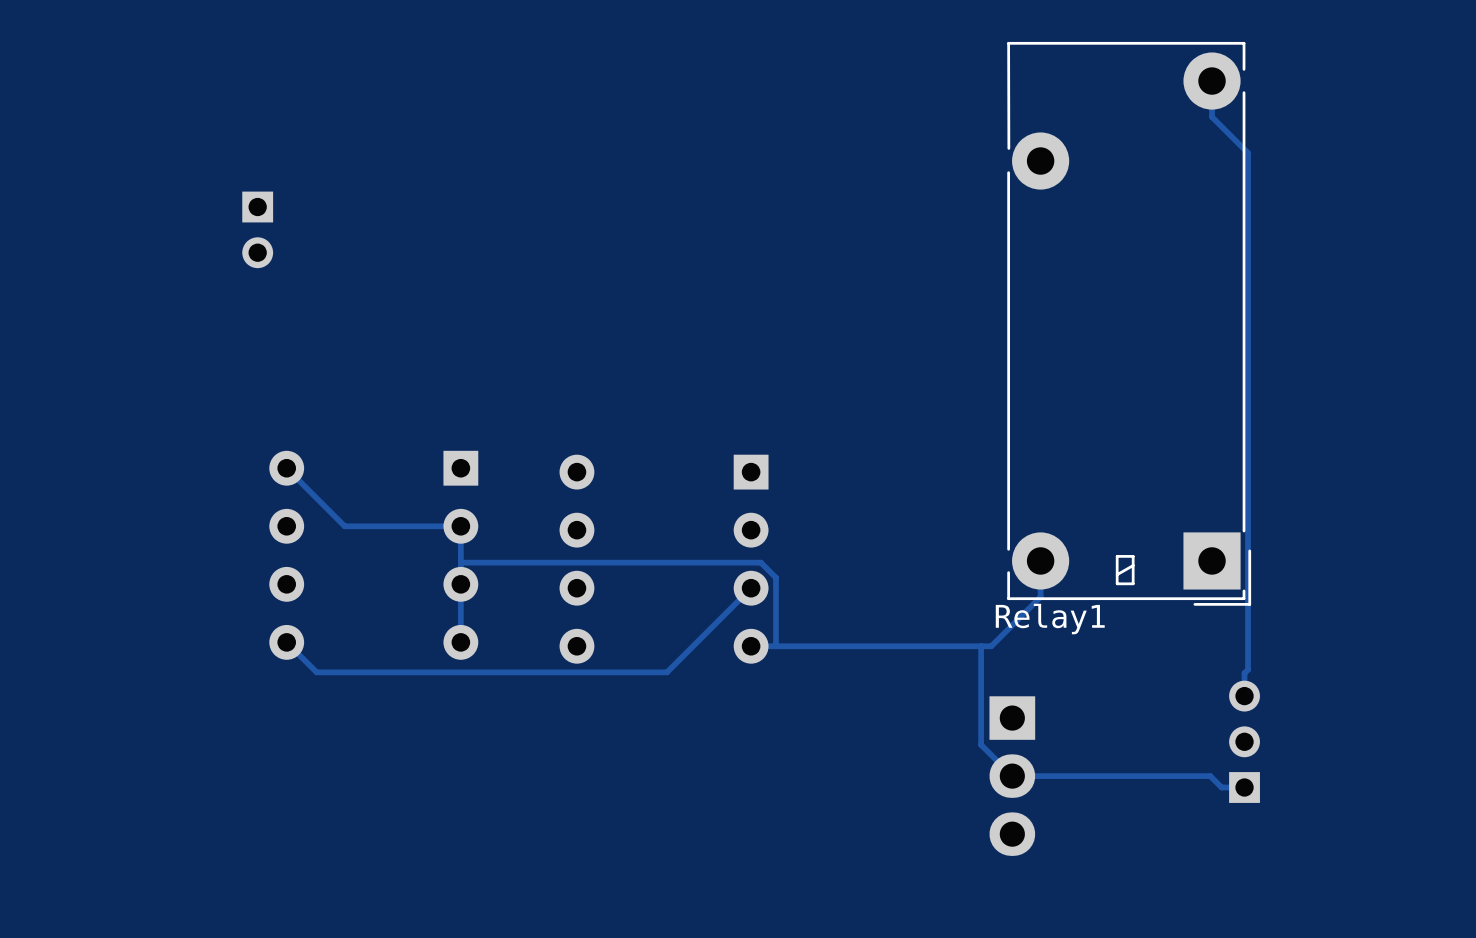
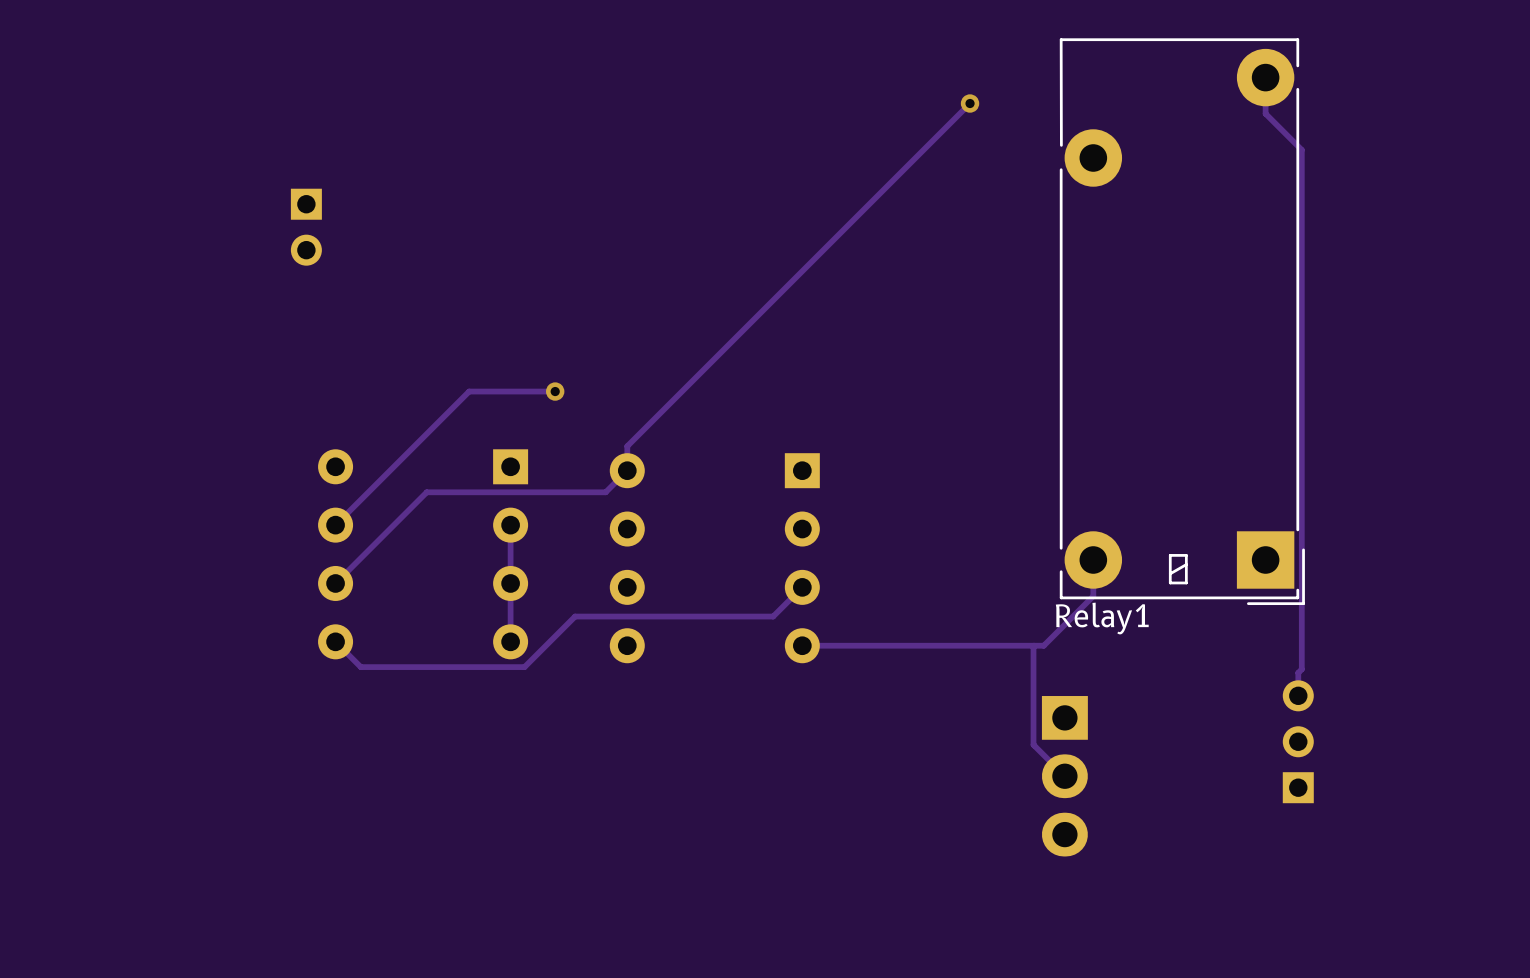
track: none -> (970, 103) (627, 446) (627, 470) (605, 492) (426, 492) (335, 583)
via: none -> (970, 103)
track: none -> (555, 391) (469, 391) (335, 525)
via: none -> (555, 391)
track: (286, 468) (344, 526) (460, 526) -> none
track: (460, 562) (760, 562) (775, 577) (775, 646) -> none
track: (722, 617) (666, 672) (316, 672) (311, 667) -> (773, 616) (575, 616) (524, 667) (360, 667)
track: (1012, 776) (1210, 776) (1221, 787) (1244, 787) -> none

